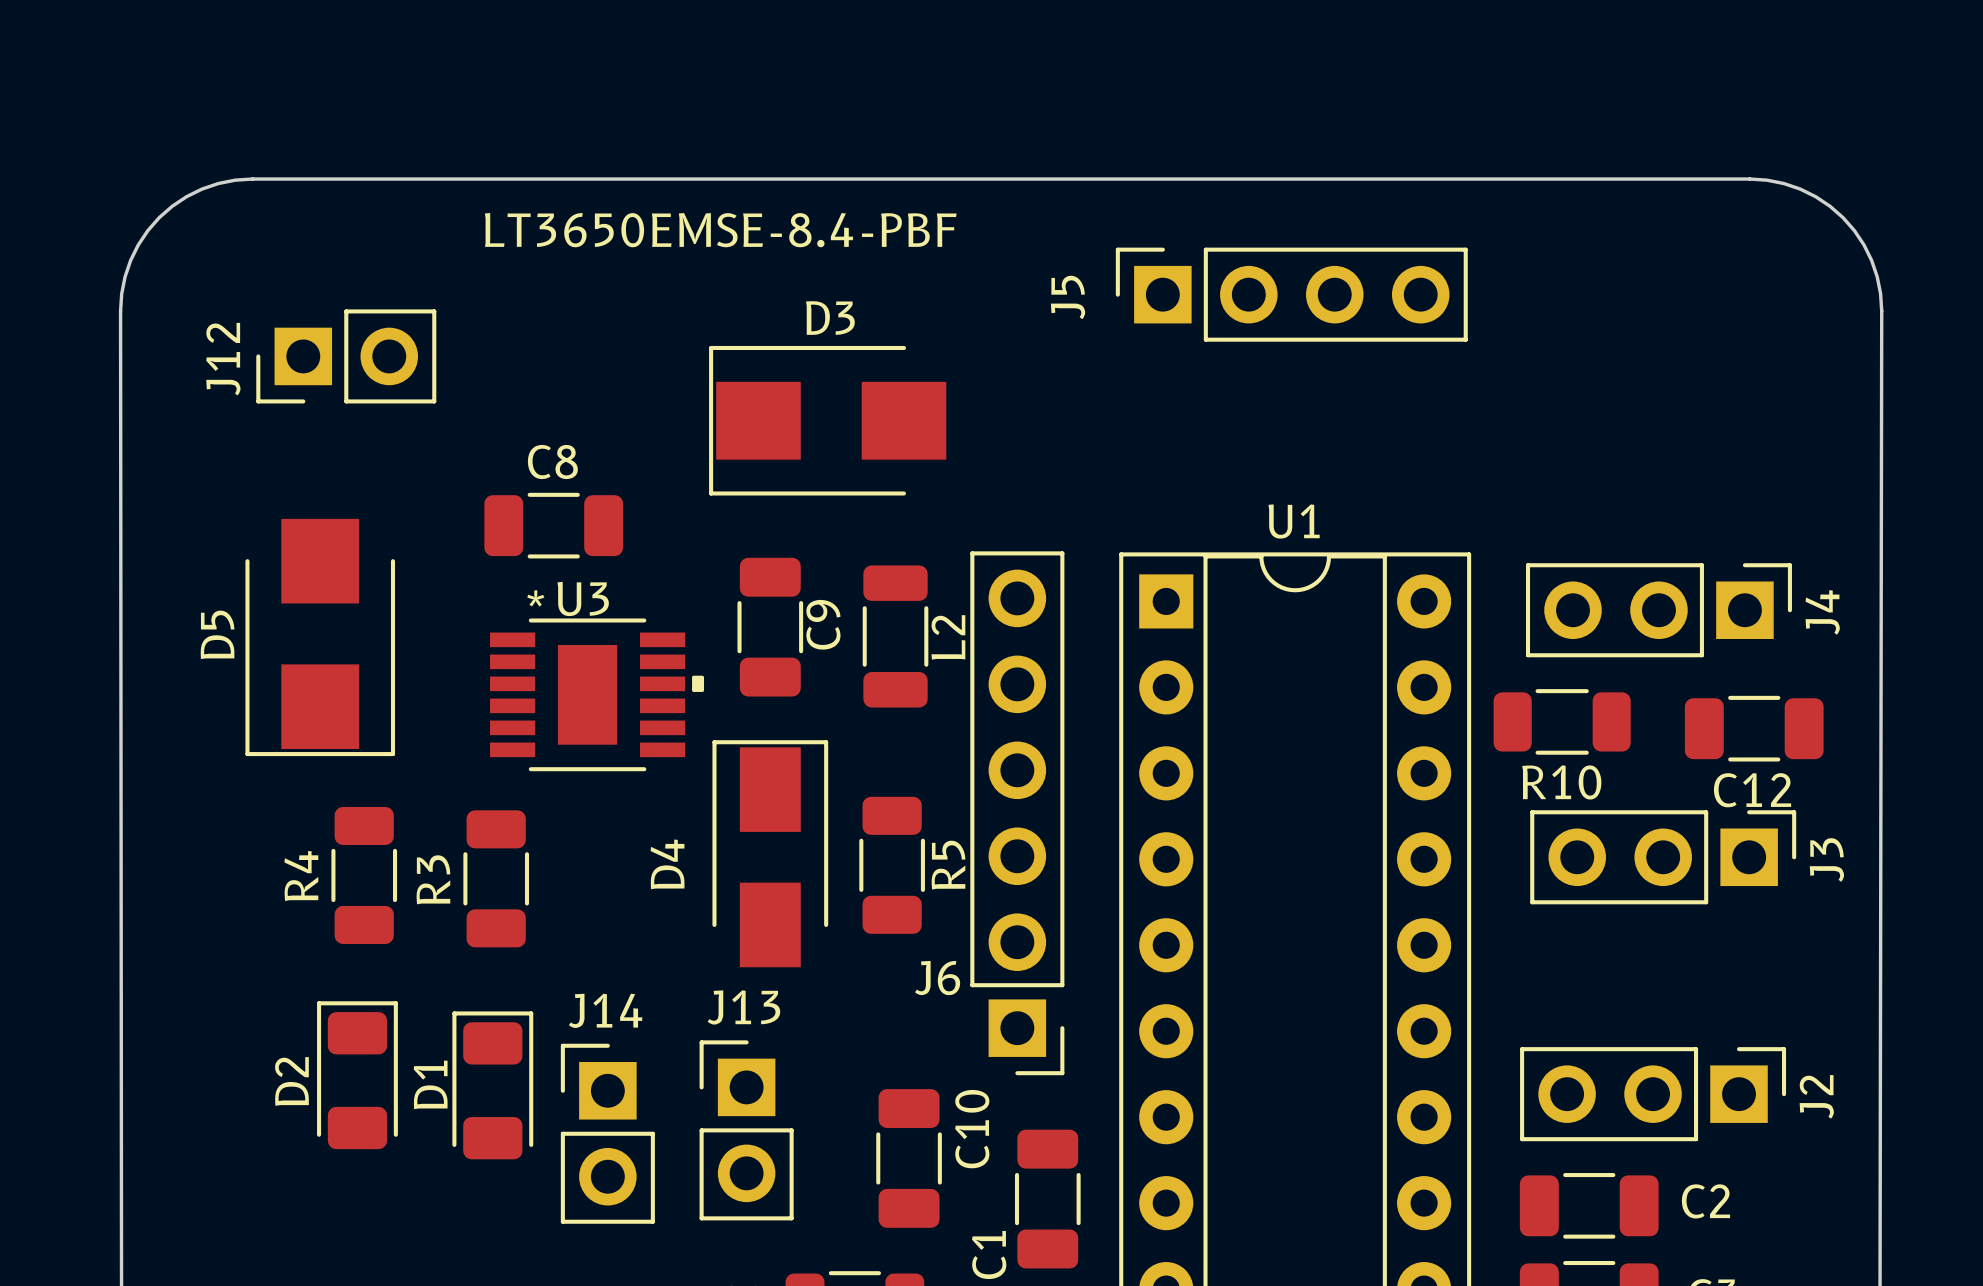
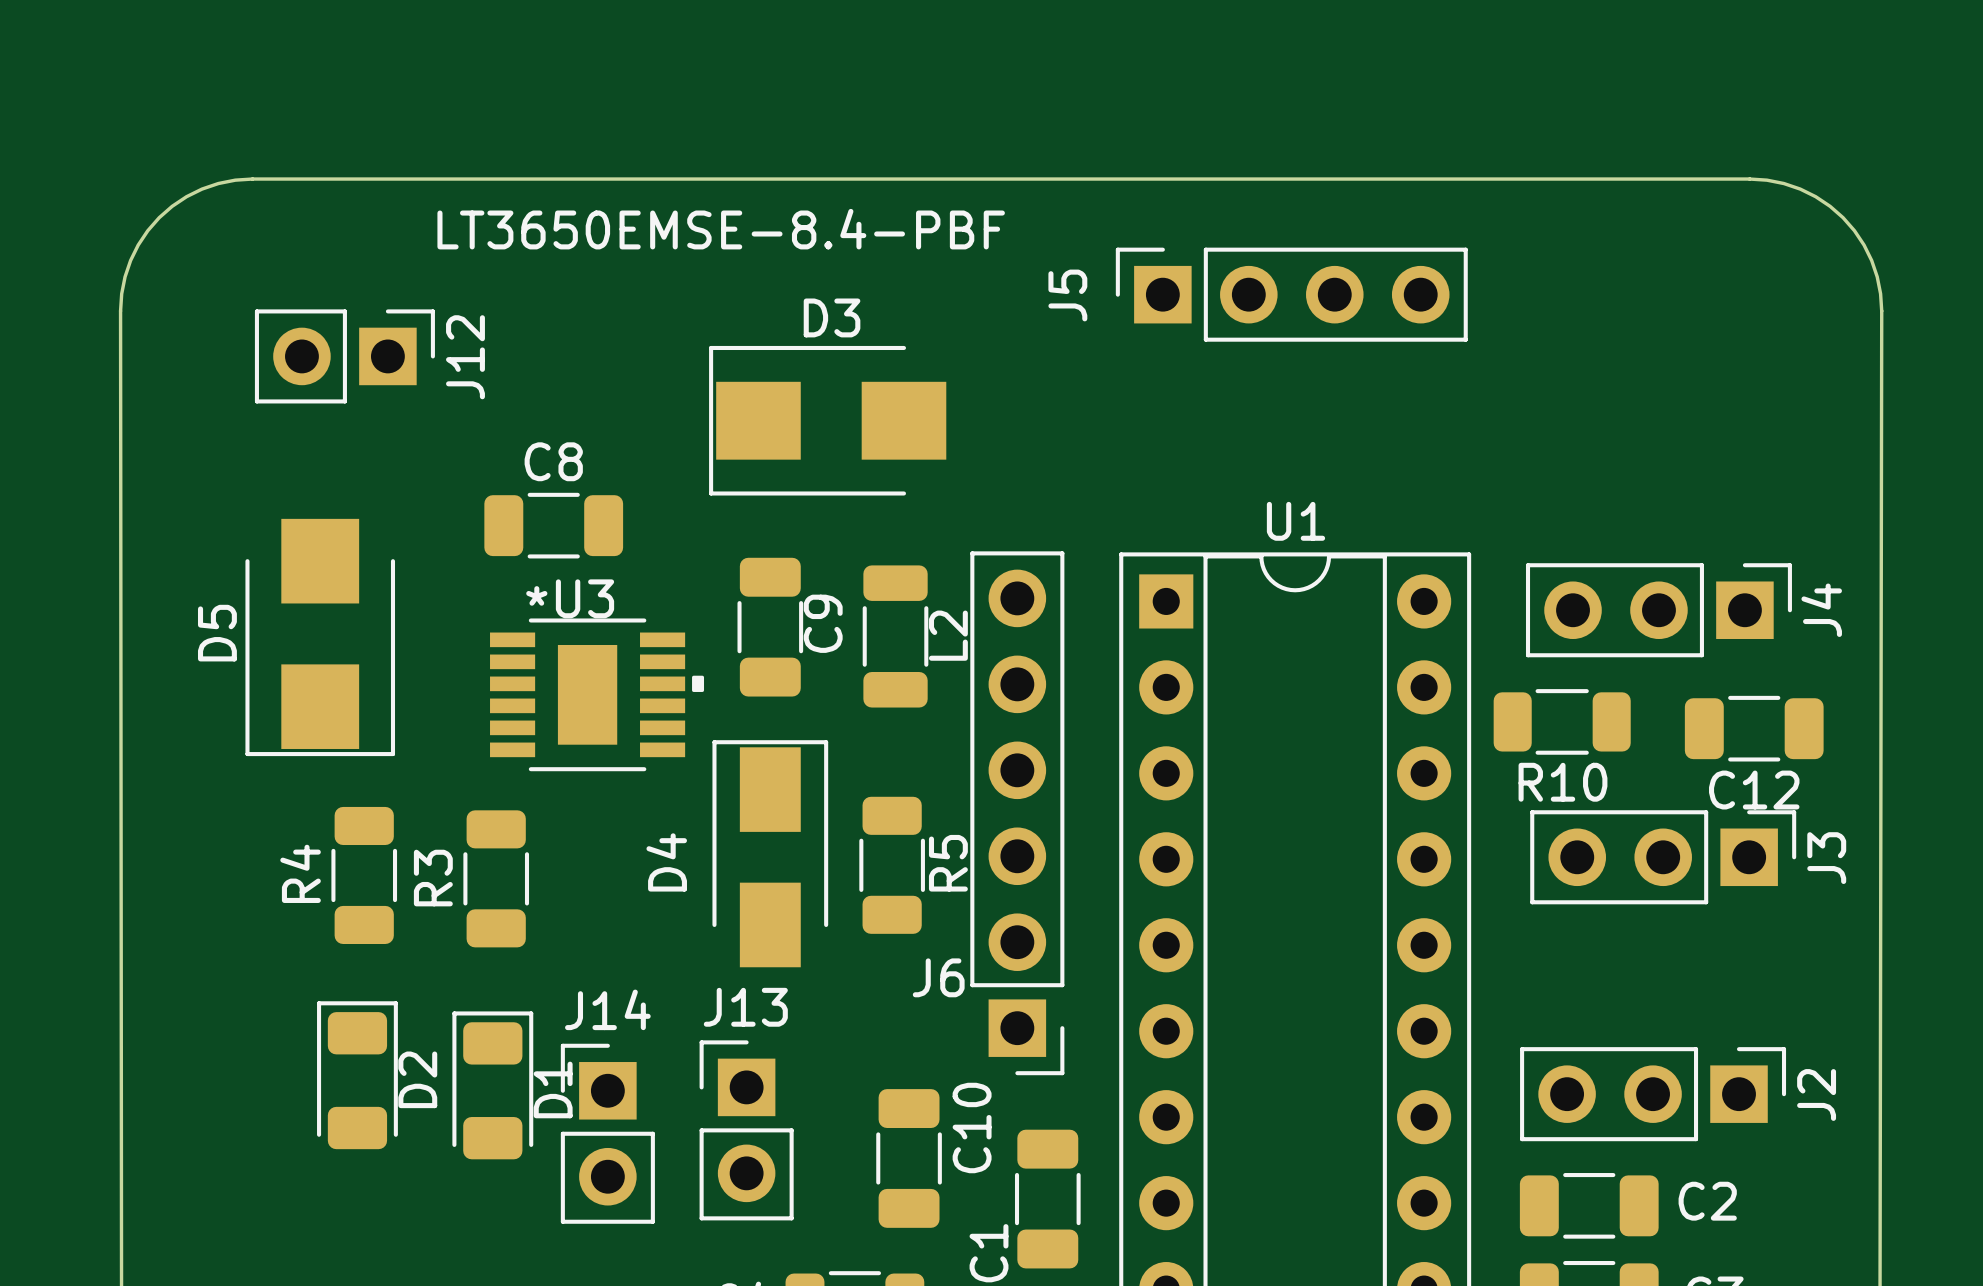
J12 rotation: 0° (346, 356) -> 180° (344, 356)
D2 name position: D2 (291, 1081) -> D2 (417, 1079)
D1 name position: D1 (430, 1084) -> D1 (553, 1089)

